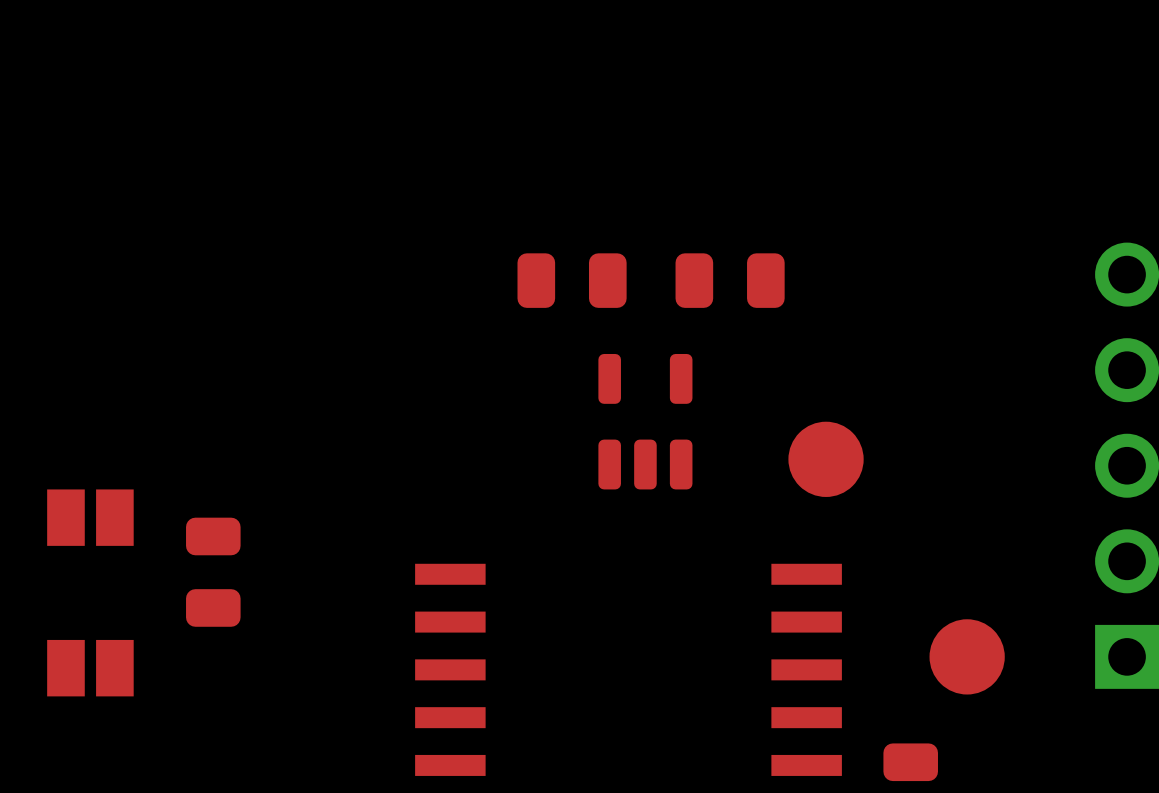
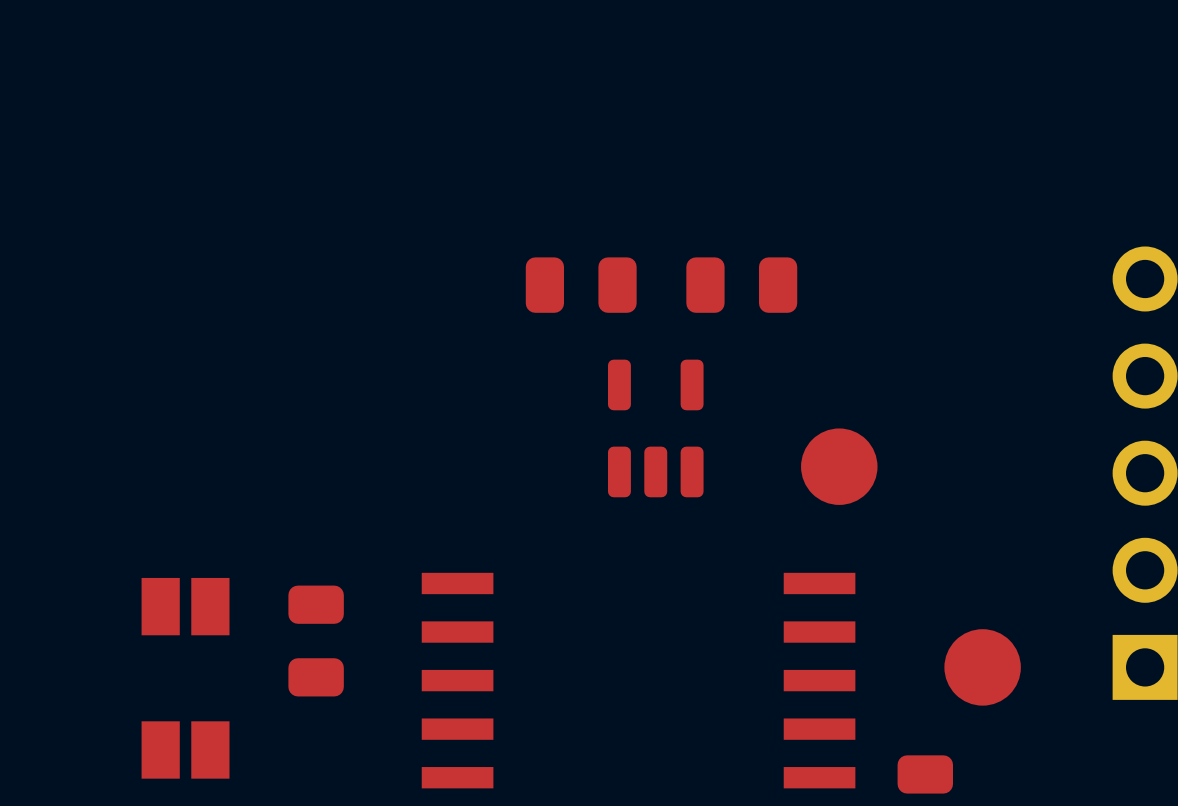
part: (90, 517) -> none
part position: (213, 572) -> (316, 641)
part: none -> (185, 606)
part: (90, 668) -> none
part: none -> (185, 749)

